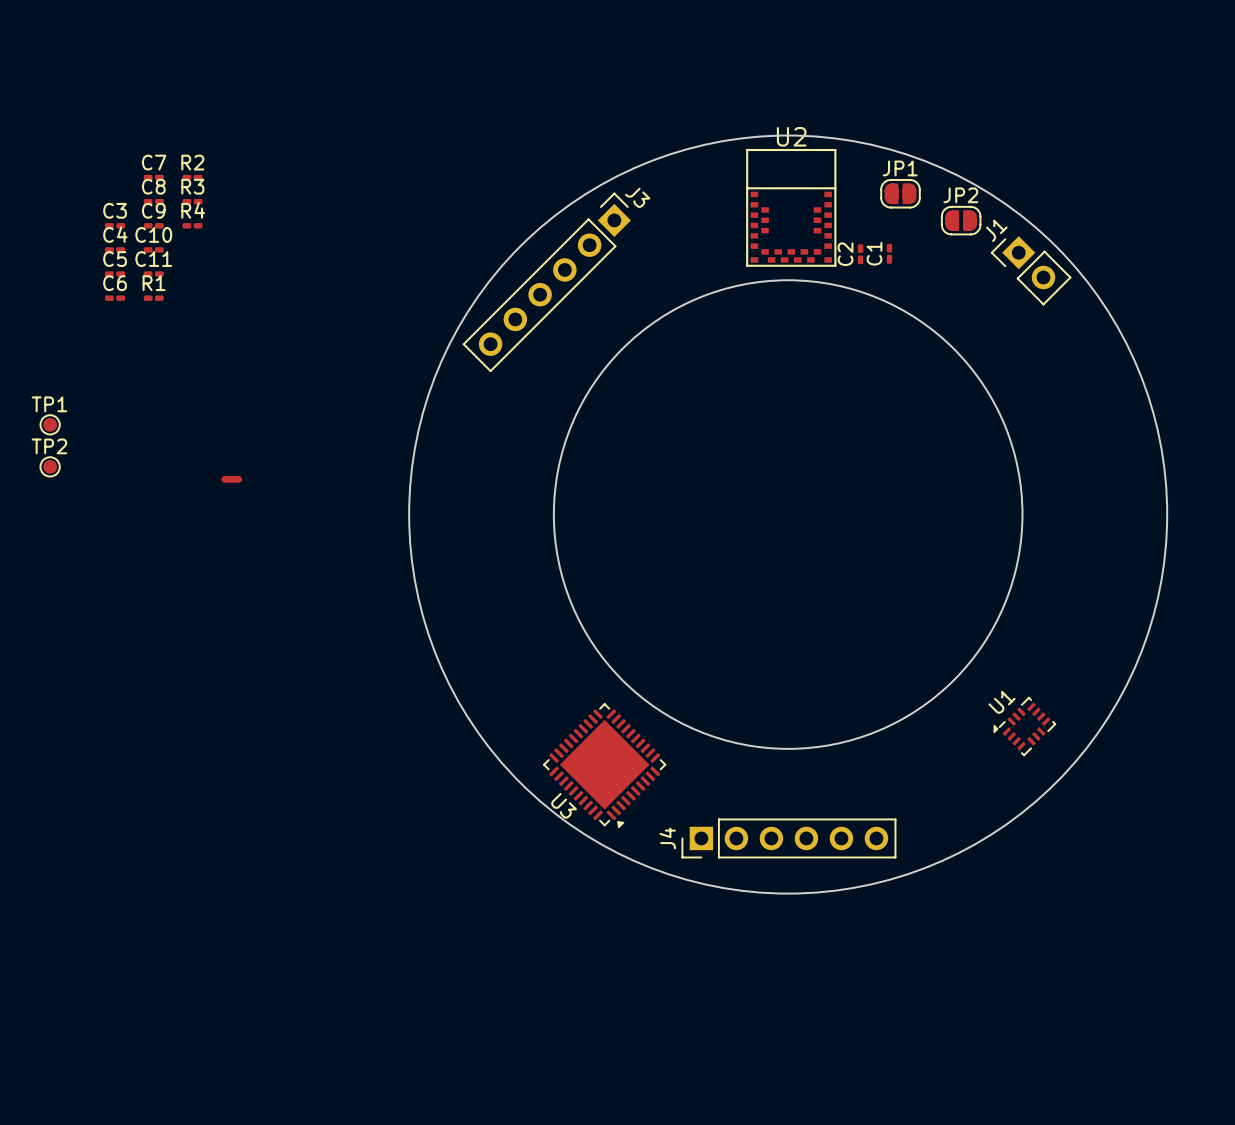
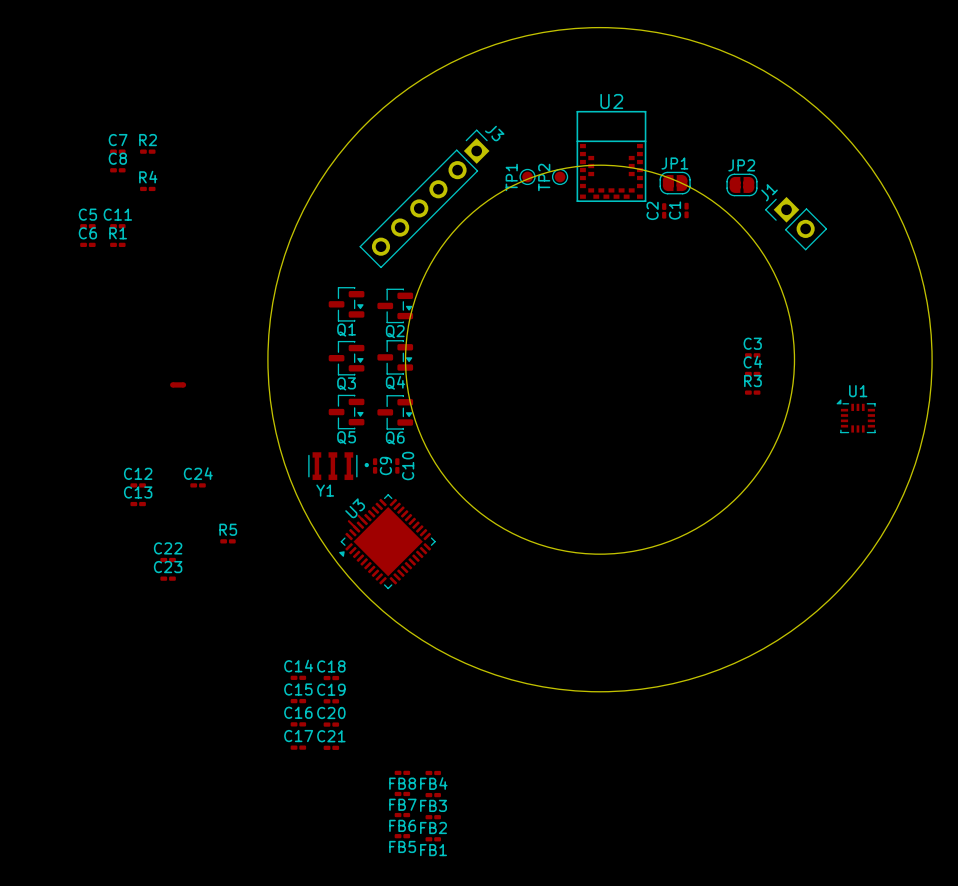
round board edge: none -> [267, 27, 933, 693]
round board edge: [408, 135, 1168, 894] -> none
JP1 position: (900, 193) -> (675, 183)
round board edge: none -> [405, 164, 795, 555]
R3 position: (192, 201) -> (752, 392)
U2 position: (791, 207) -> (611, 156)
C3 position: (115, 225) -> (752, 355)
C9 rotation: 0° (153, 225) -> 90° clockwise (375, 465)
C9 position: (153, 225) -> (375, 465)
C4 position: (115, 249) -> (752, 373)
C10 rotation: 0° (153, 249) -> 90° clockwise (397, 465)
C10 position: (153, 249) -> (397, 465)
round board edge: [553, 279, 1023, 750] -> none
J3 position: (546, 282) -> (424, 198)
Q1: none -> (346, 304)
Q2: none -> (395, 305)
TP1 name rotation: 0° (49, 404) -> 90° counterclockwise (511, 177)
TP1 position: (50, 424) -> (527, 176)
Q4: none -> (395, 357)
Q3: none -> (346, 358)
TP2 name rotation: 0° (49, 446) -> 90° counterclockwise (544, 177)
TP2 position: (50, 466) -> (560, 176)
Q5: none -> (346, 412)
Q6: none -> (395, 412)
Y1: none -> (338, 466)
C12: none -> (138, 485)
C24: none -> (198, 485)
C13: none -> (138, 504)
track: none -> (358, 515) (364, 521)
track: none -> (348, 521) (356, 528)
R5: none -> (227, 541)
C22: none -> (168, 559)
U1 rotation: 0° (1024, 726) -> 45° clockwise (856, 416)
U1 position: (1024, 726) -> (856, 416)
C23: none -> (168, 578)
U3 rotation: 0° (604, 765) -> 90° clockwise (387, 541)
U3 position: (604, 765) -> (387, 541)
J4: (788, 838) -> none
C14: none -> (298, 677)
C18: none -> (331, 678)
C15: none -> (298, 701)
C19: none -> (331, 701)
C16: none -> (298, 724)
C20: none -> (331, 724)
C17: none -> (298, 747)
C21: none -> (331, 747)
FB8: none -> (402, 772)
FB4: none -> (433, 772)
FB7: none -> (402, 793)
FB3: none -> (433, 795)
FB6: none -> (402, 815)
FB2: none -> (433, 817)
FB5: none -> (402, 836)
FB1: none -> (433, 839)

